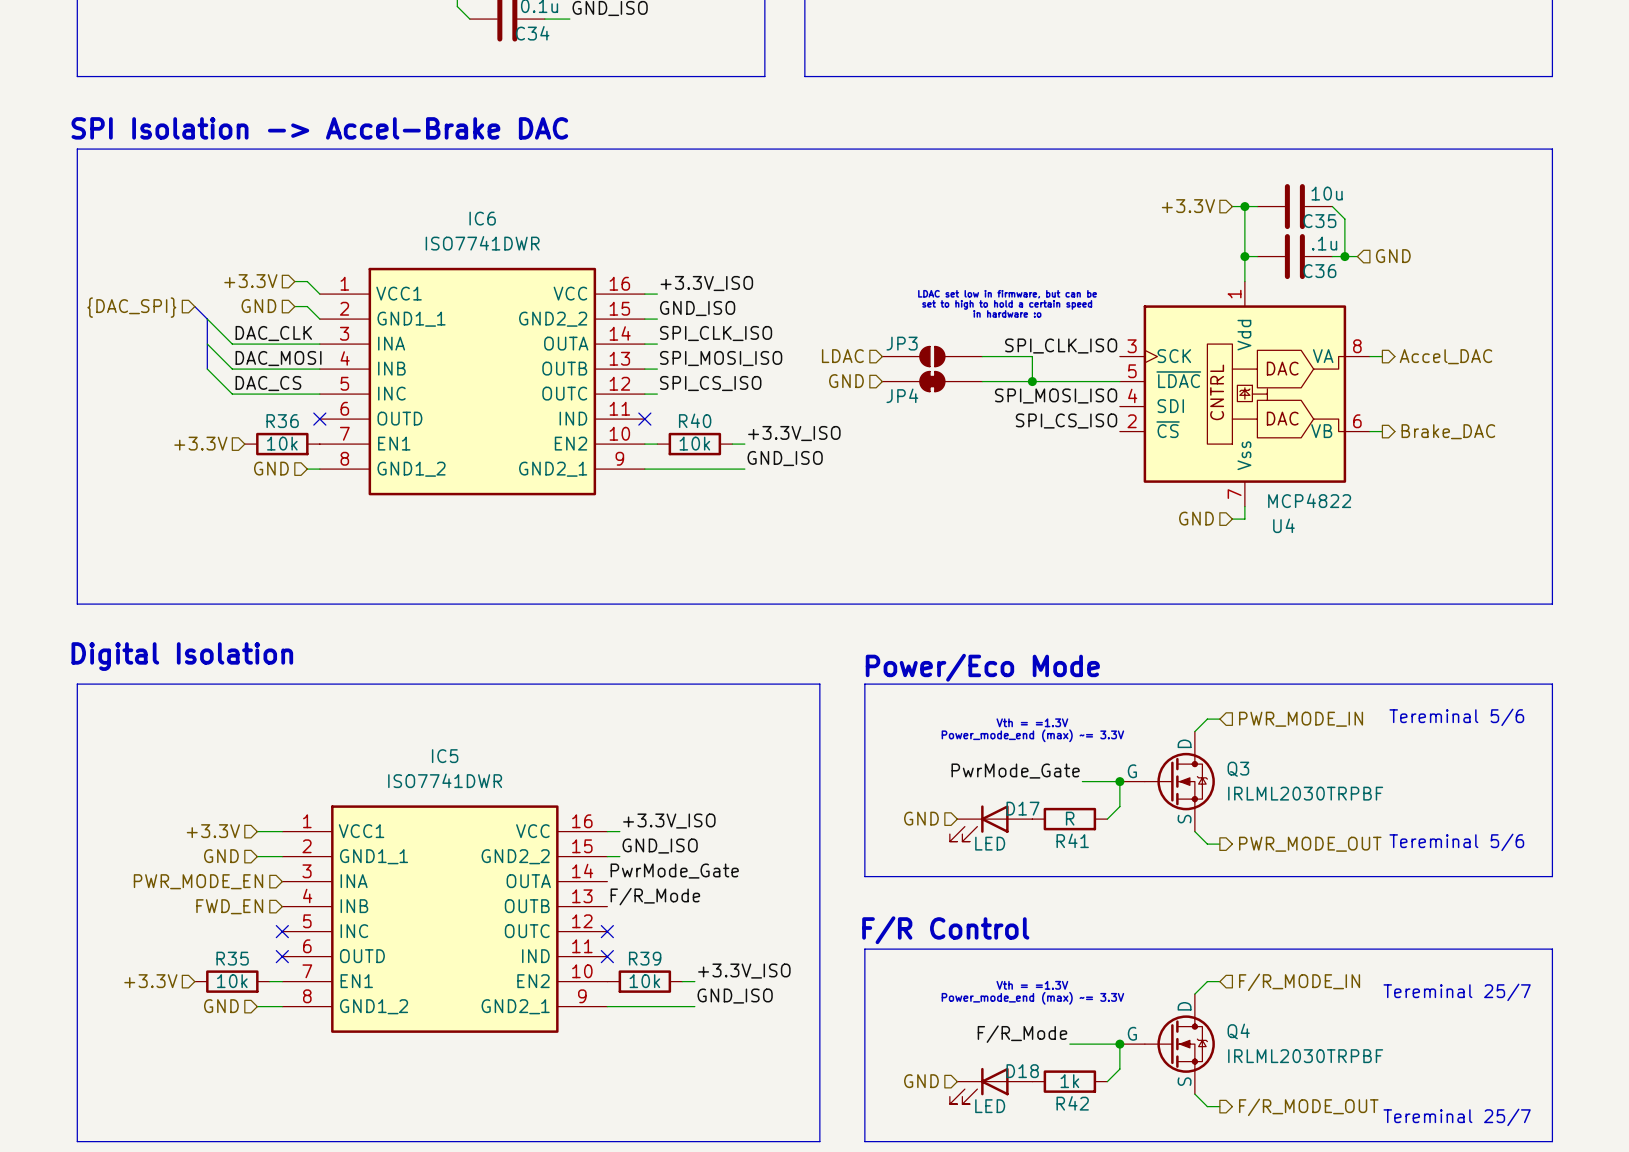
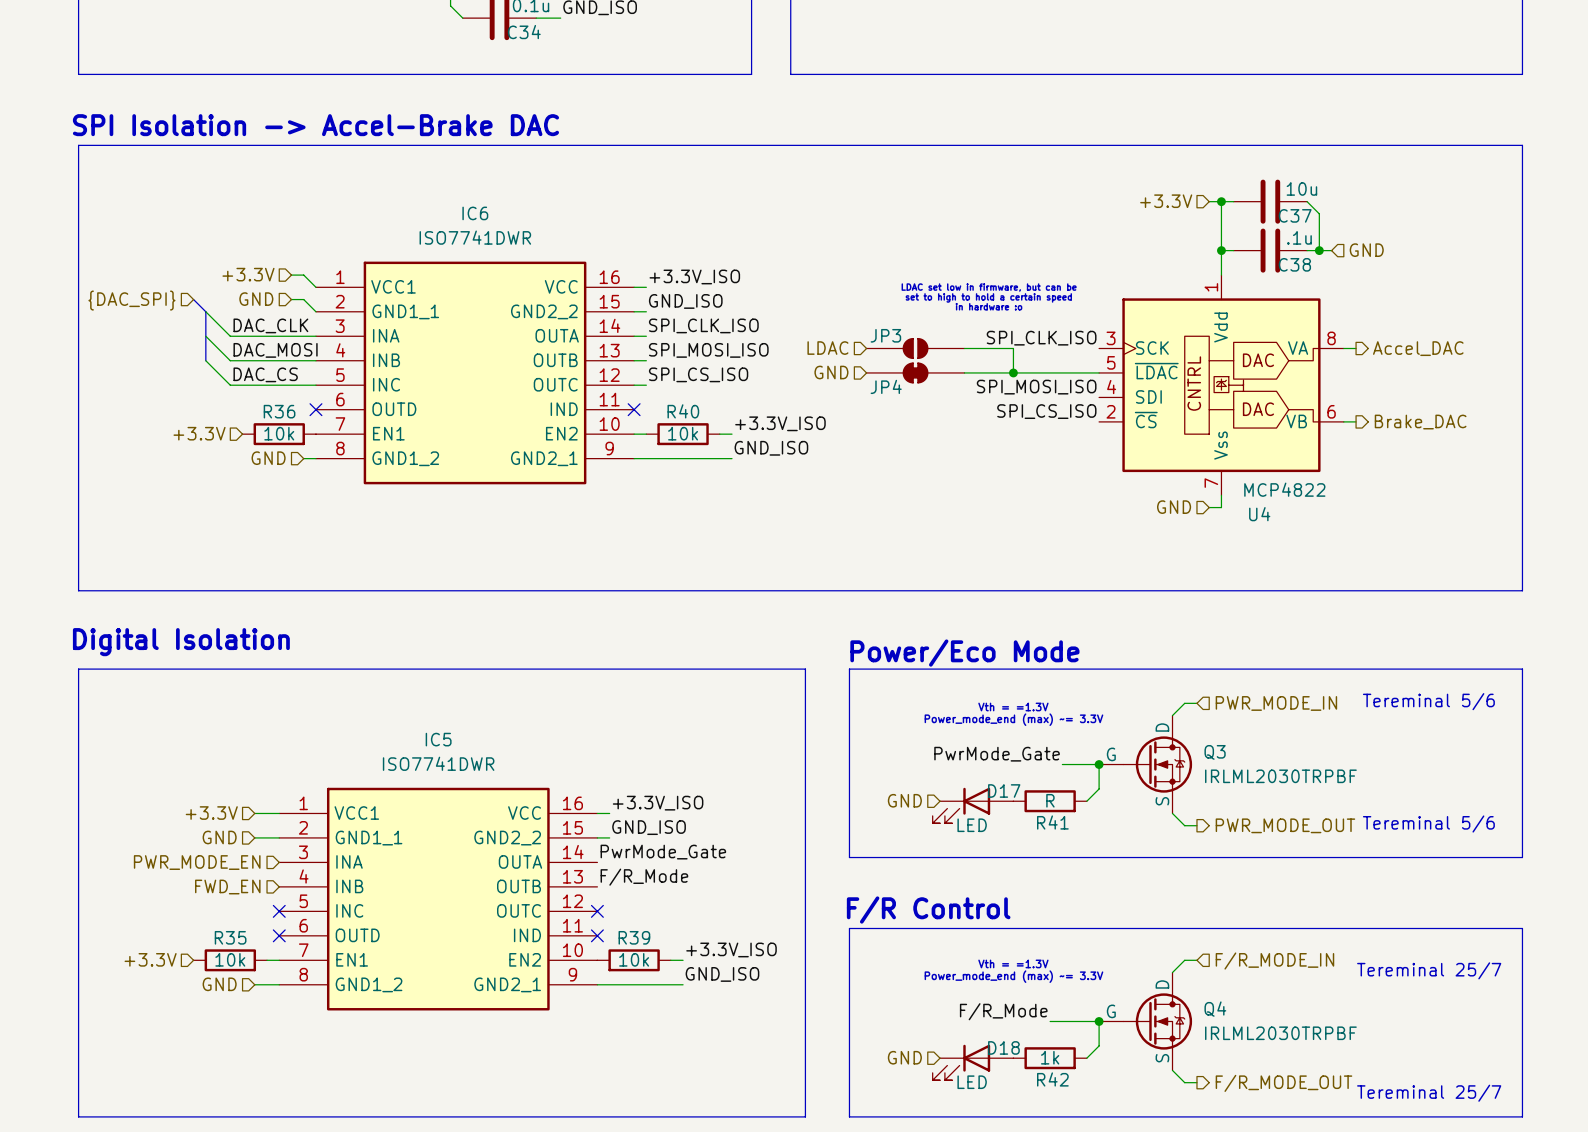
C35 name: C35 (1319, 221) -> C37 (1295, 215)
C36 name: C36 (1319, 271) -> C38 (1294, 264)

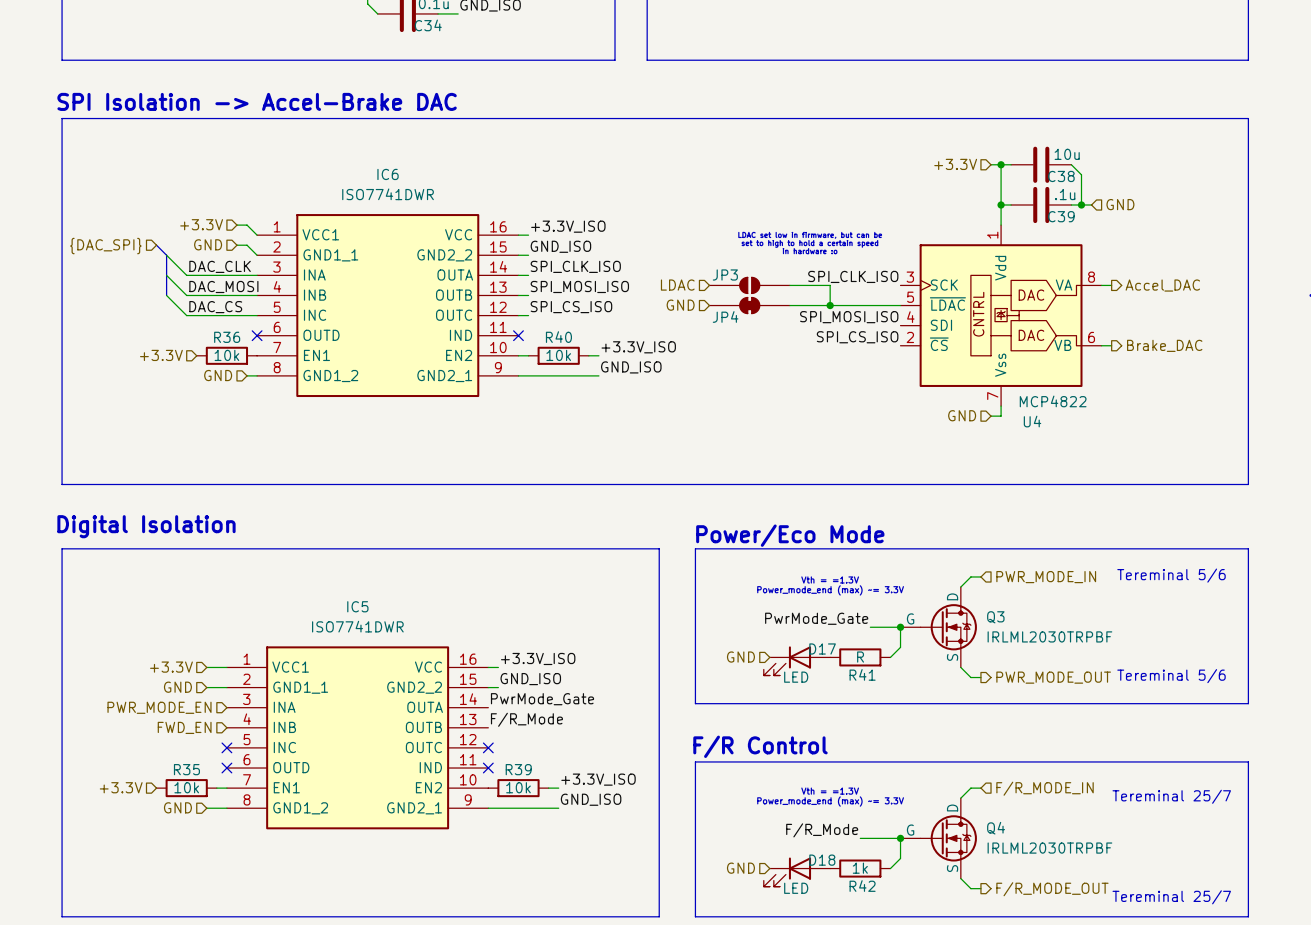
C37 name: C37 (1295, 215) -> C38 (1061, 176)
C38 name: C38 (1294, 264) -> C39 (1061, 216)

